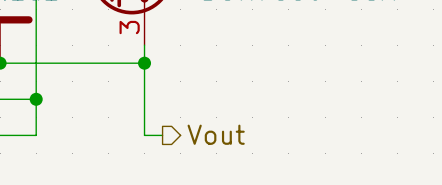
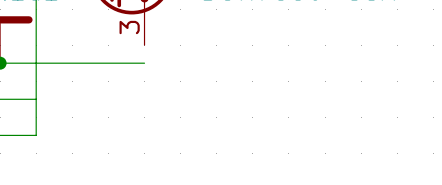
wire: (144, 45) (144, 135) (162, 135) -> none
junction: (144, 63) -> none
junction: (36, 99) -> none
hierarchical label: Vout (216, 134) -> none

